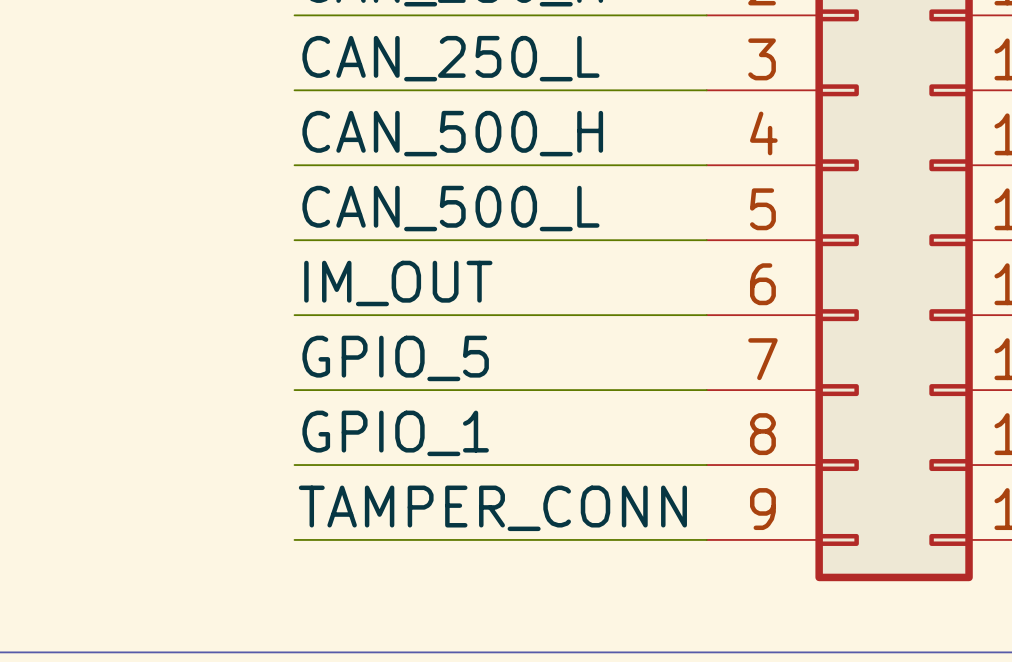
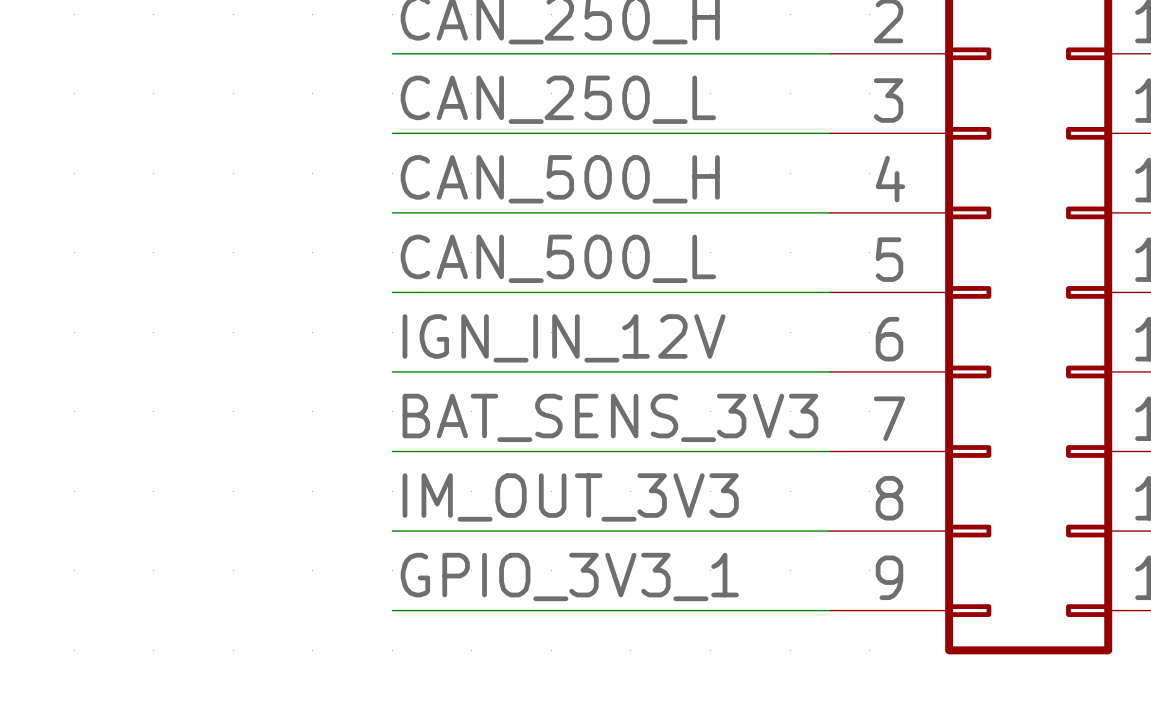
label: IM_OUT (398, 283) -> IGN_IN_12V (564, 338)
label: GPIO_5 (395, 358) -> BAT_SENS_3V3 (610, 417)
label: GPIO_1 (395, 433) -> IM_OUT_3V3 (570, 497)
label: TAMPER_CONN (492, 508) -> GPIO_3V3_1 (569, 576)

